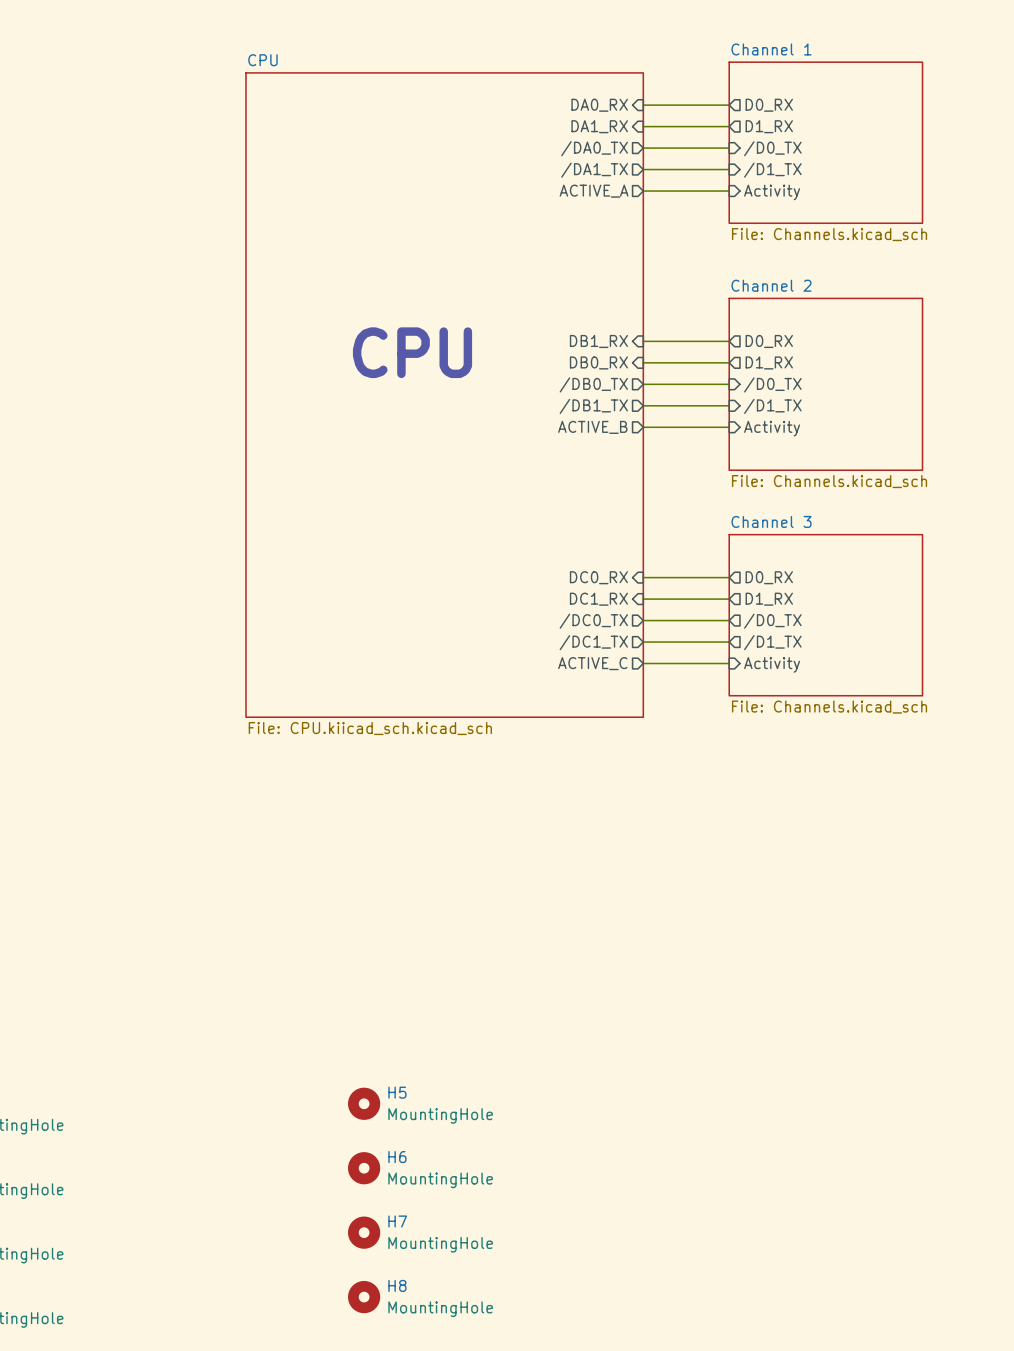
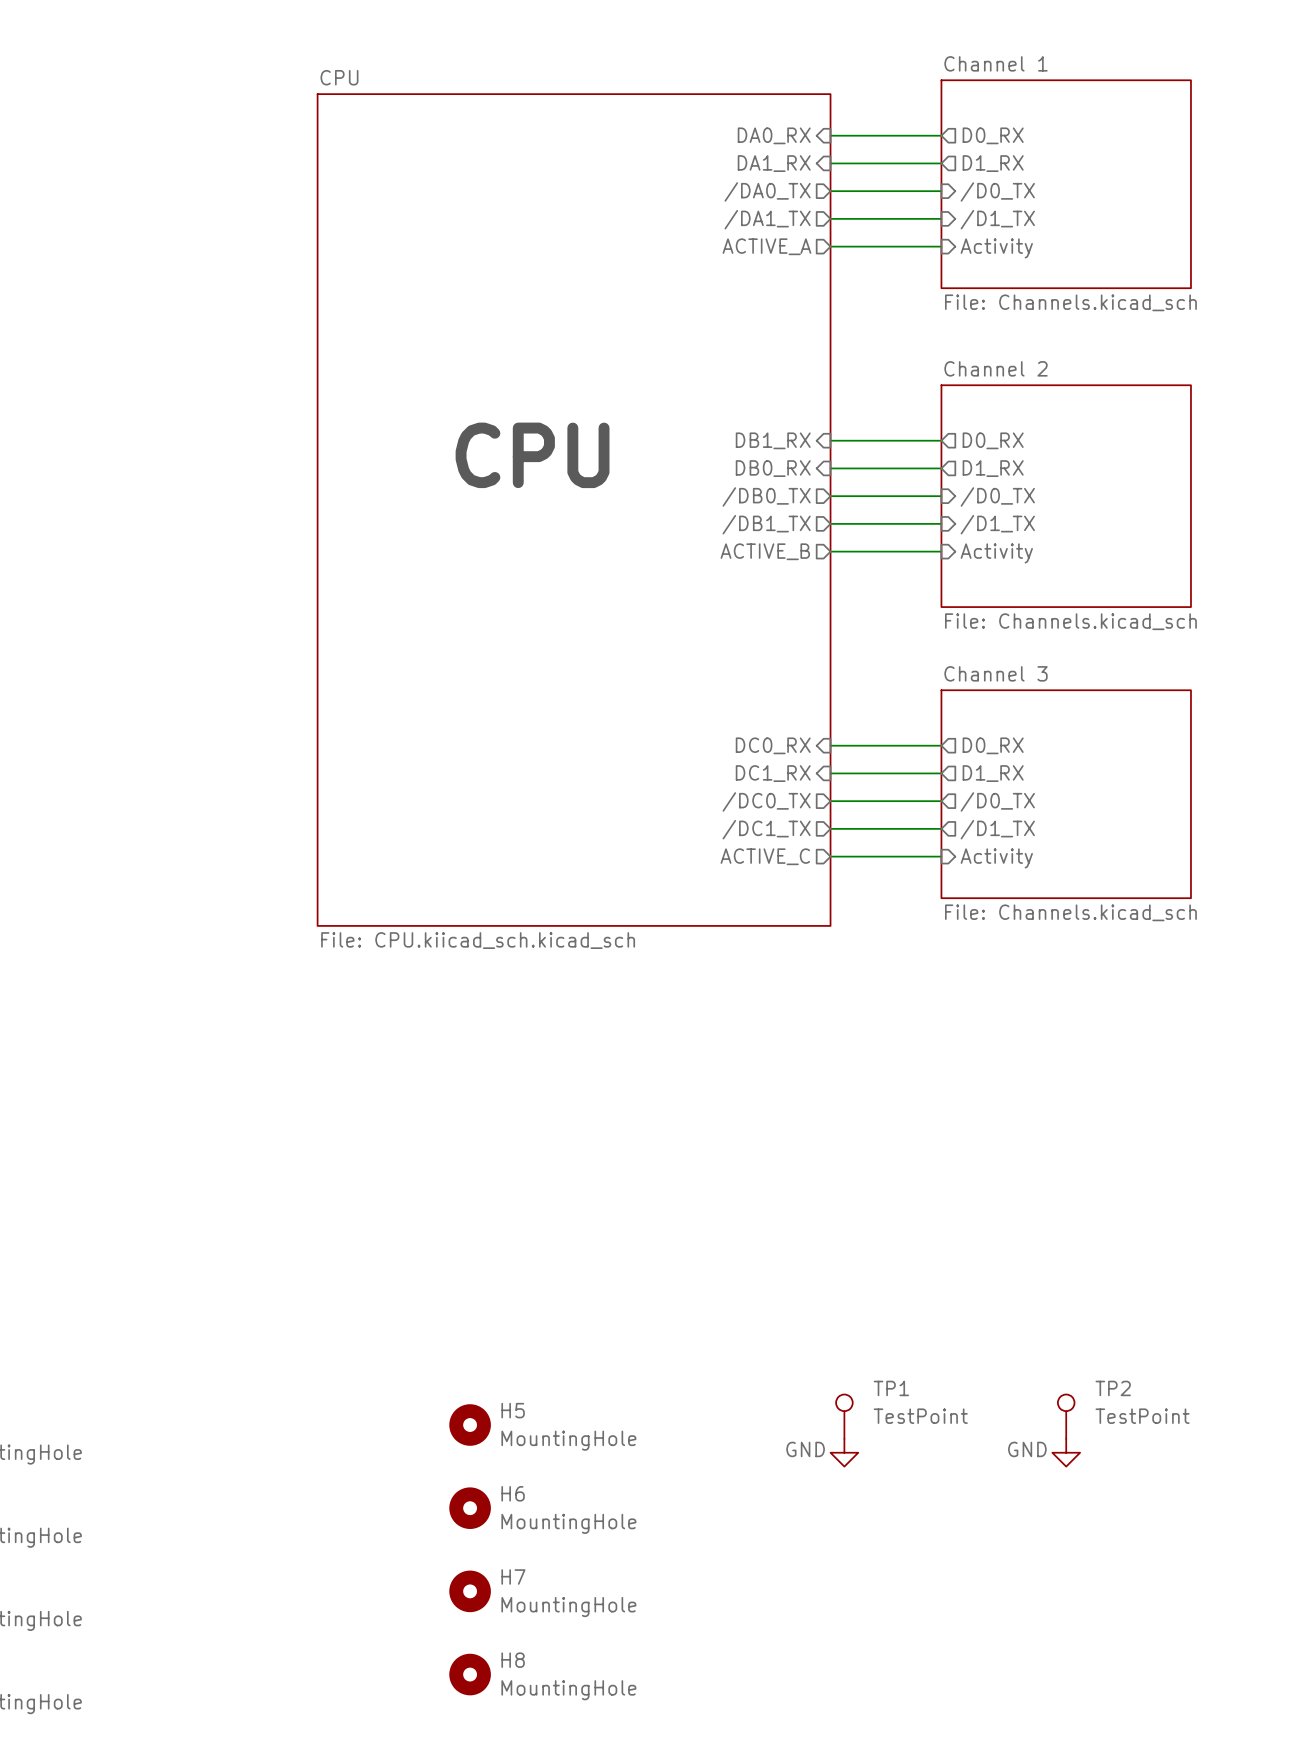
TP1: none -> TestPoint (844, 1416)
TP2: none -> TestPoint (1066, 1416)
power symbol: none -> GND (844, 1452)
power symbol: none -> GND (1066, 1452)

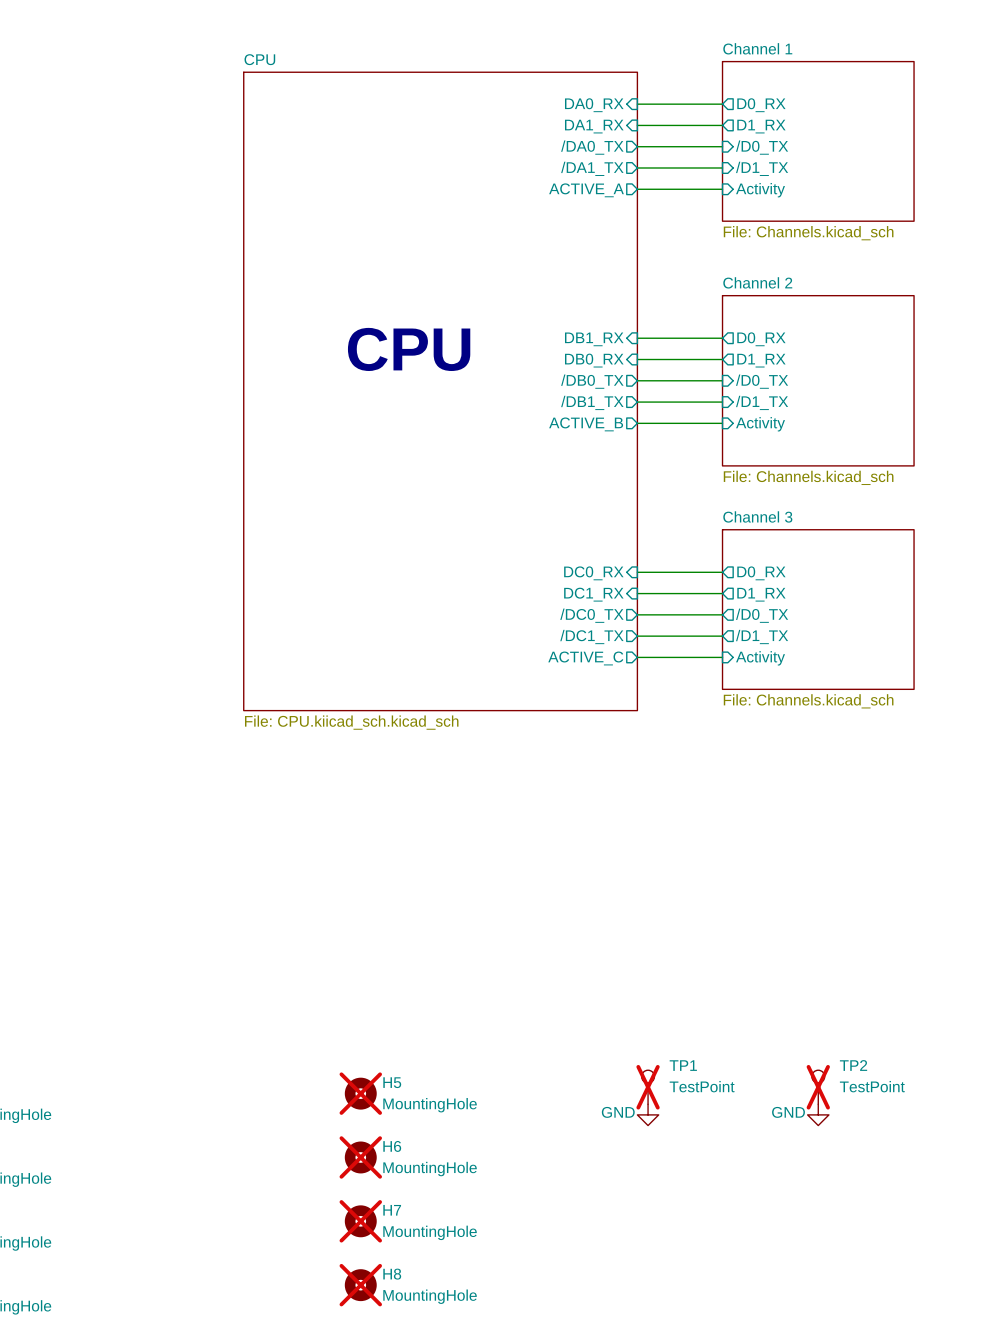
TP1 do-not-place cross: none -> (648, 1087)
TP2 do-not-place cross: none -> (818, 1087)
H5 do-not-place cross: none -> (360, 1093)
H6 do-not-place cross: none -> (360, 1157)
H7 do-not-place cross: none -> (360, 1221)
H8 do-not-place cross: none -> (360, 1285)

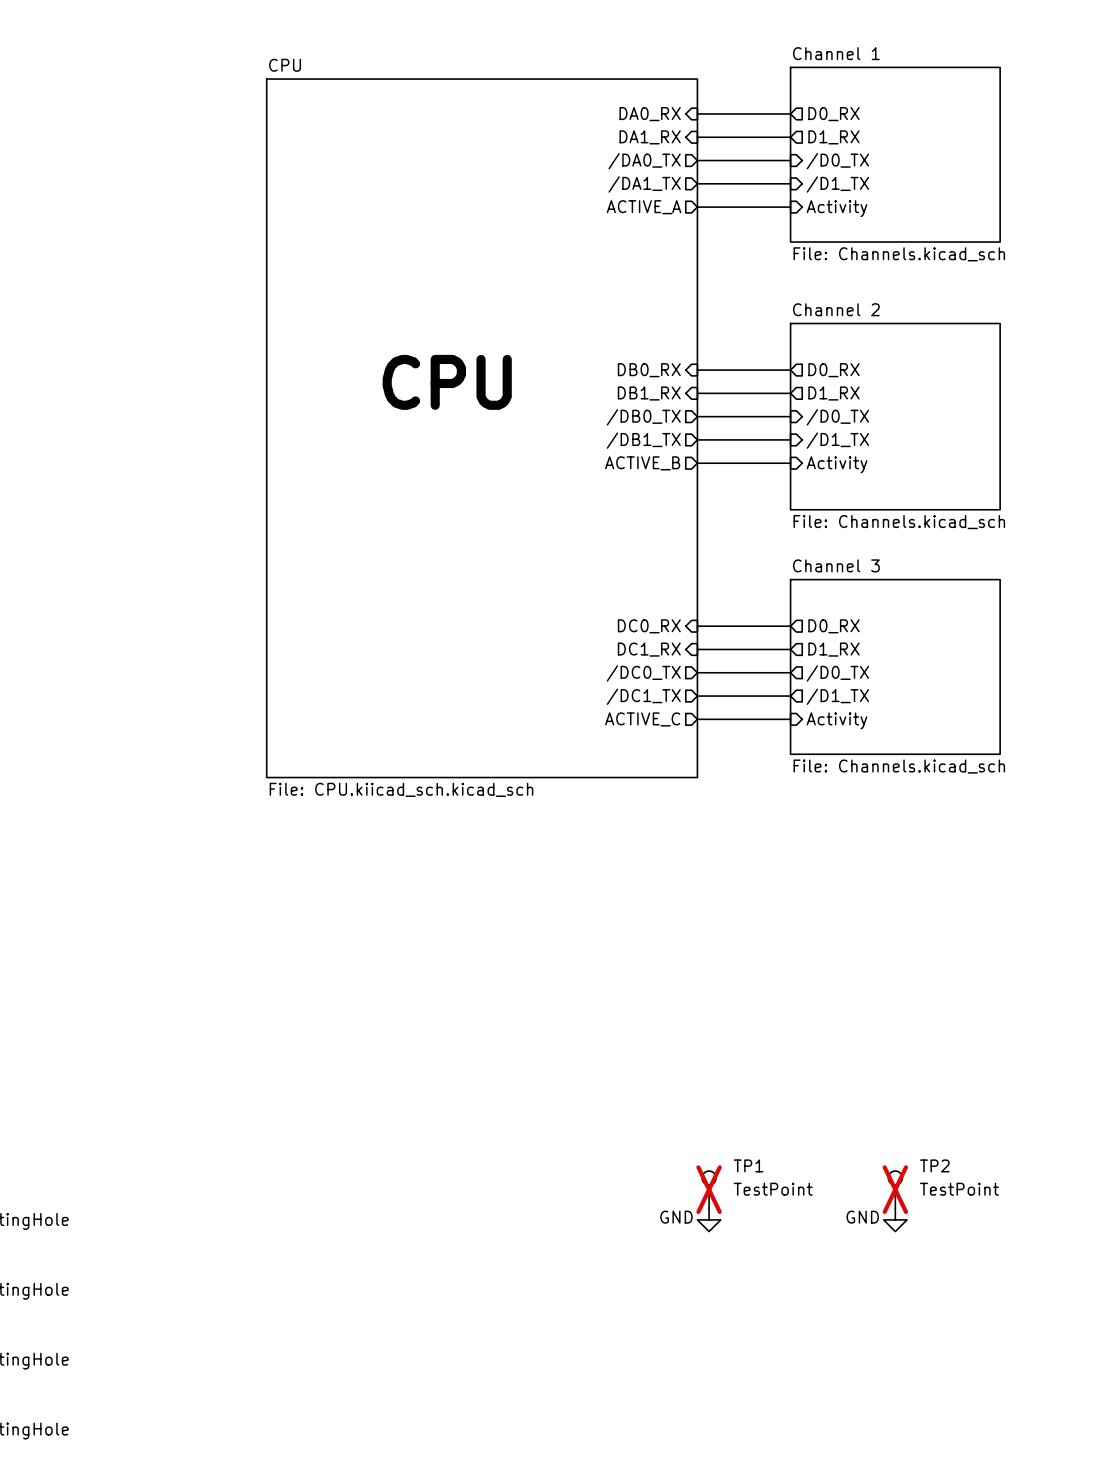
sheet pin: DB1_RX (594, 339) -> DB0_RX (649, 370)
sheet pin: DB0_RX (594, 360) -> DB1_RX (649, 393)
H5: MountingHole (360, 1093) -> none
H6: MountingHole (360, 1157) -> none
H7: MountingHole (360, 1221) -> none
H8: MountingHole (360, 1285) -> none

